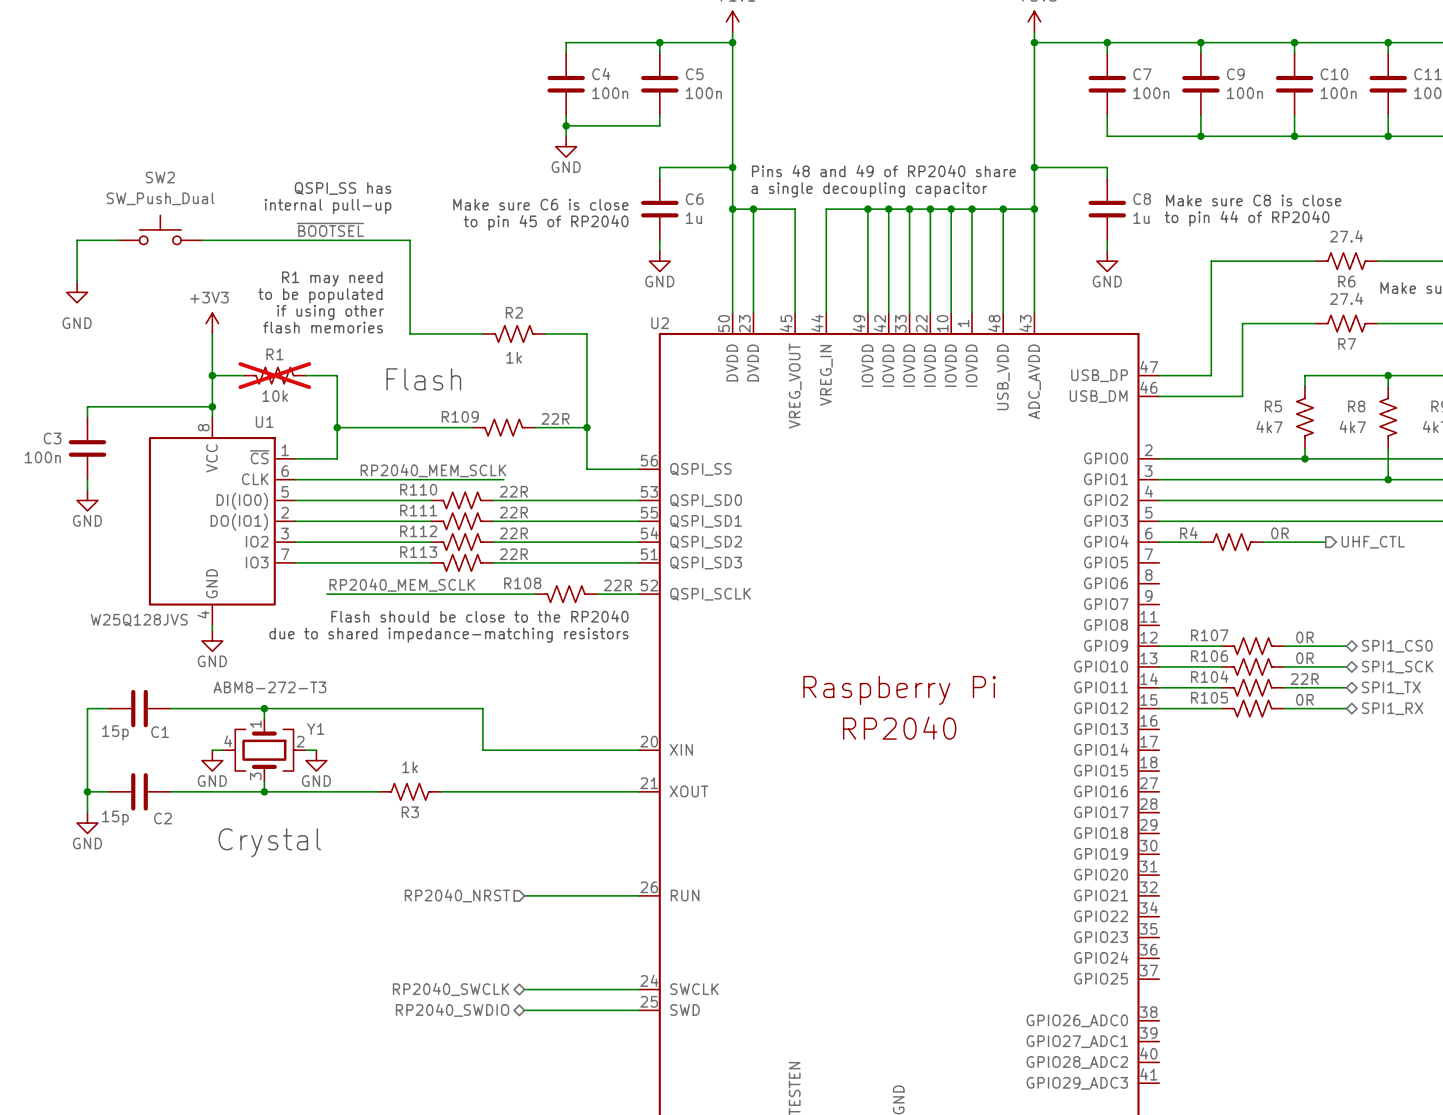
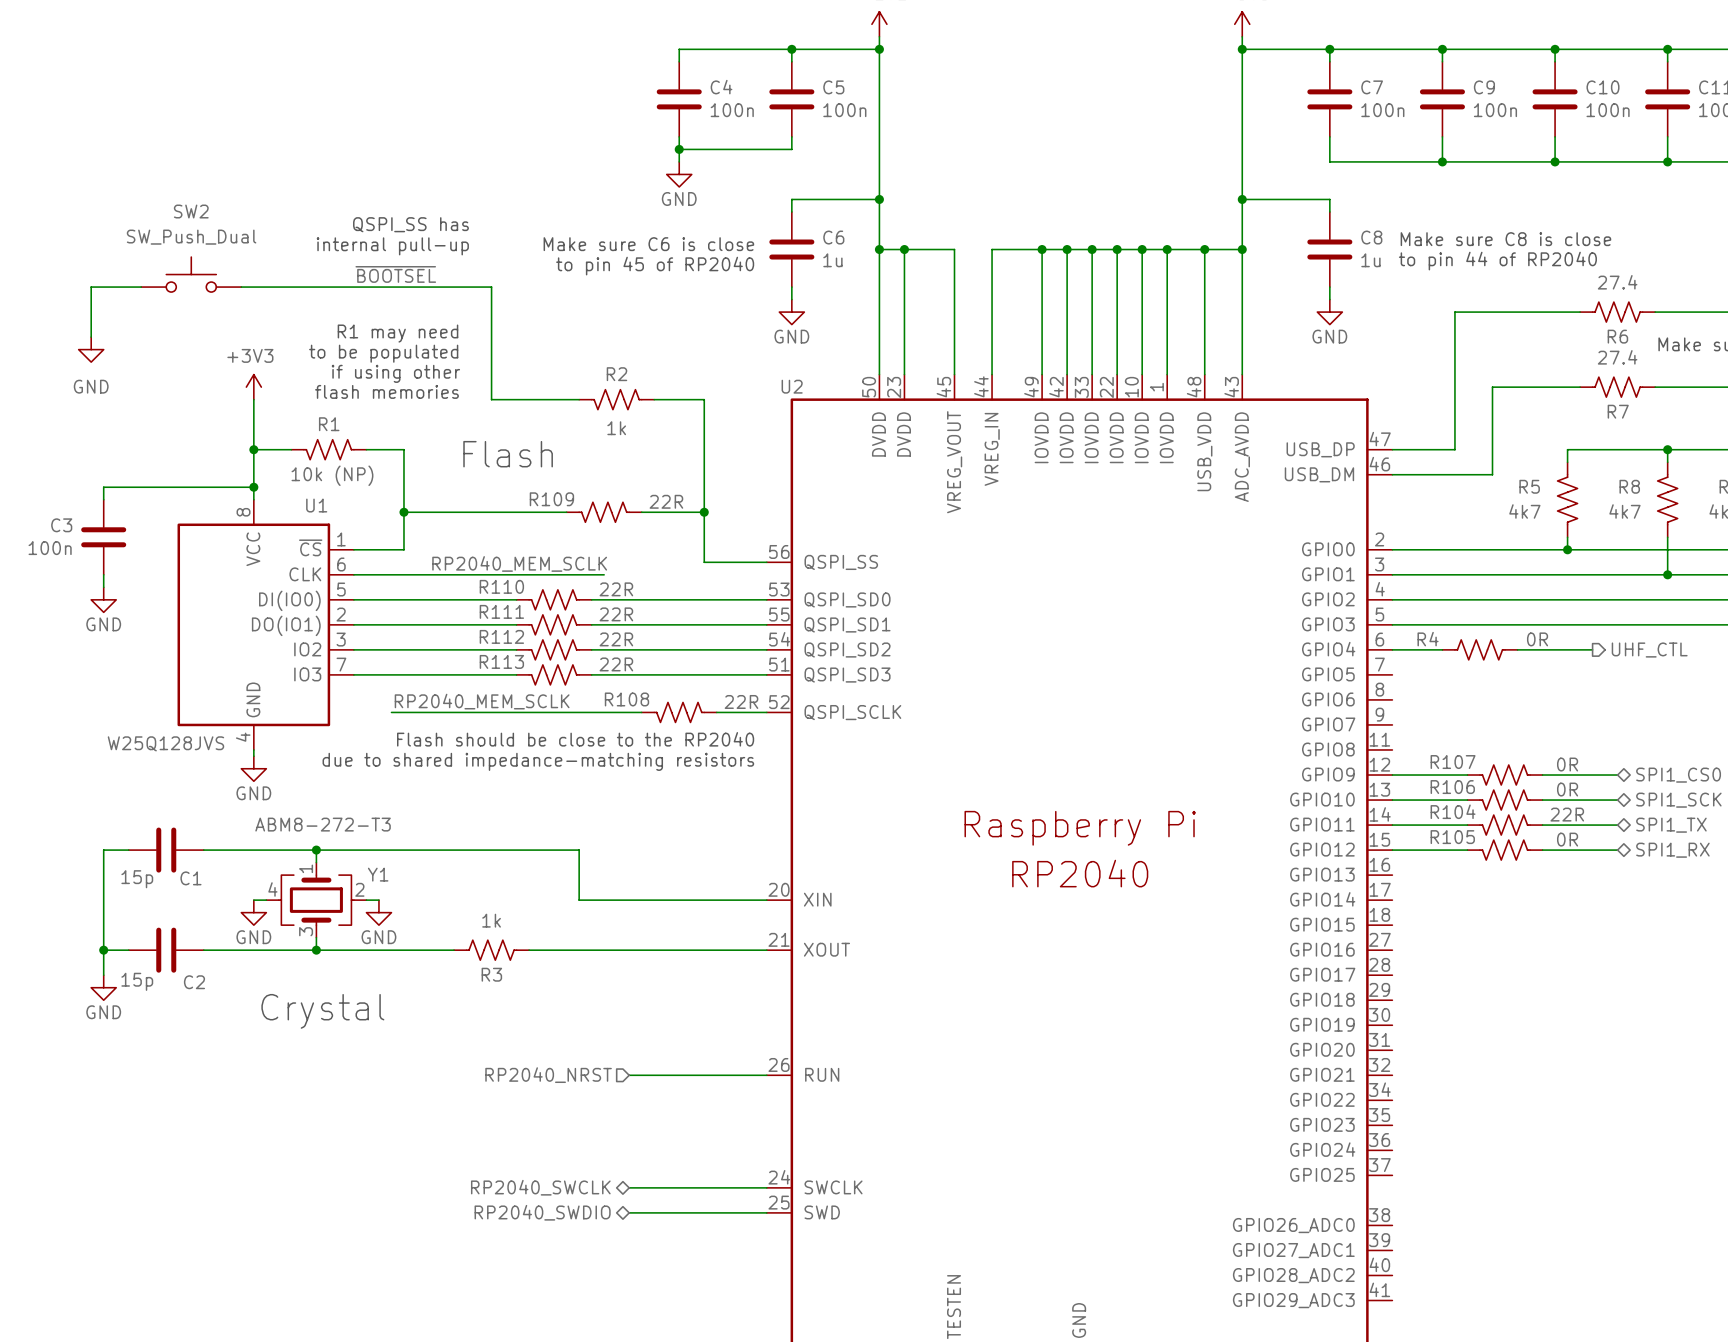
text: Pins 48 and 49 of RP2040 share (883, 171) -> none
text: a single decoupling capacitor (869, 189) -> none
R1 do-not-place cross: (274, 375) -> none
R1 value: 10k (275, 396) -> 10k (NP) (332, 475)

